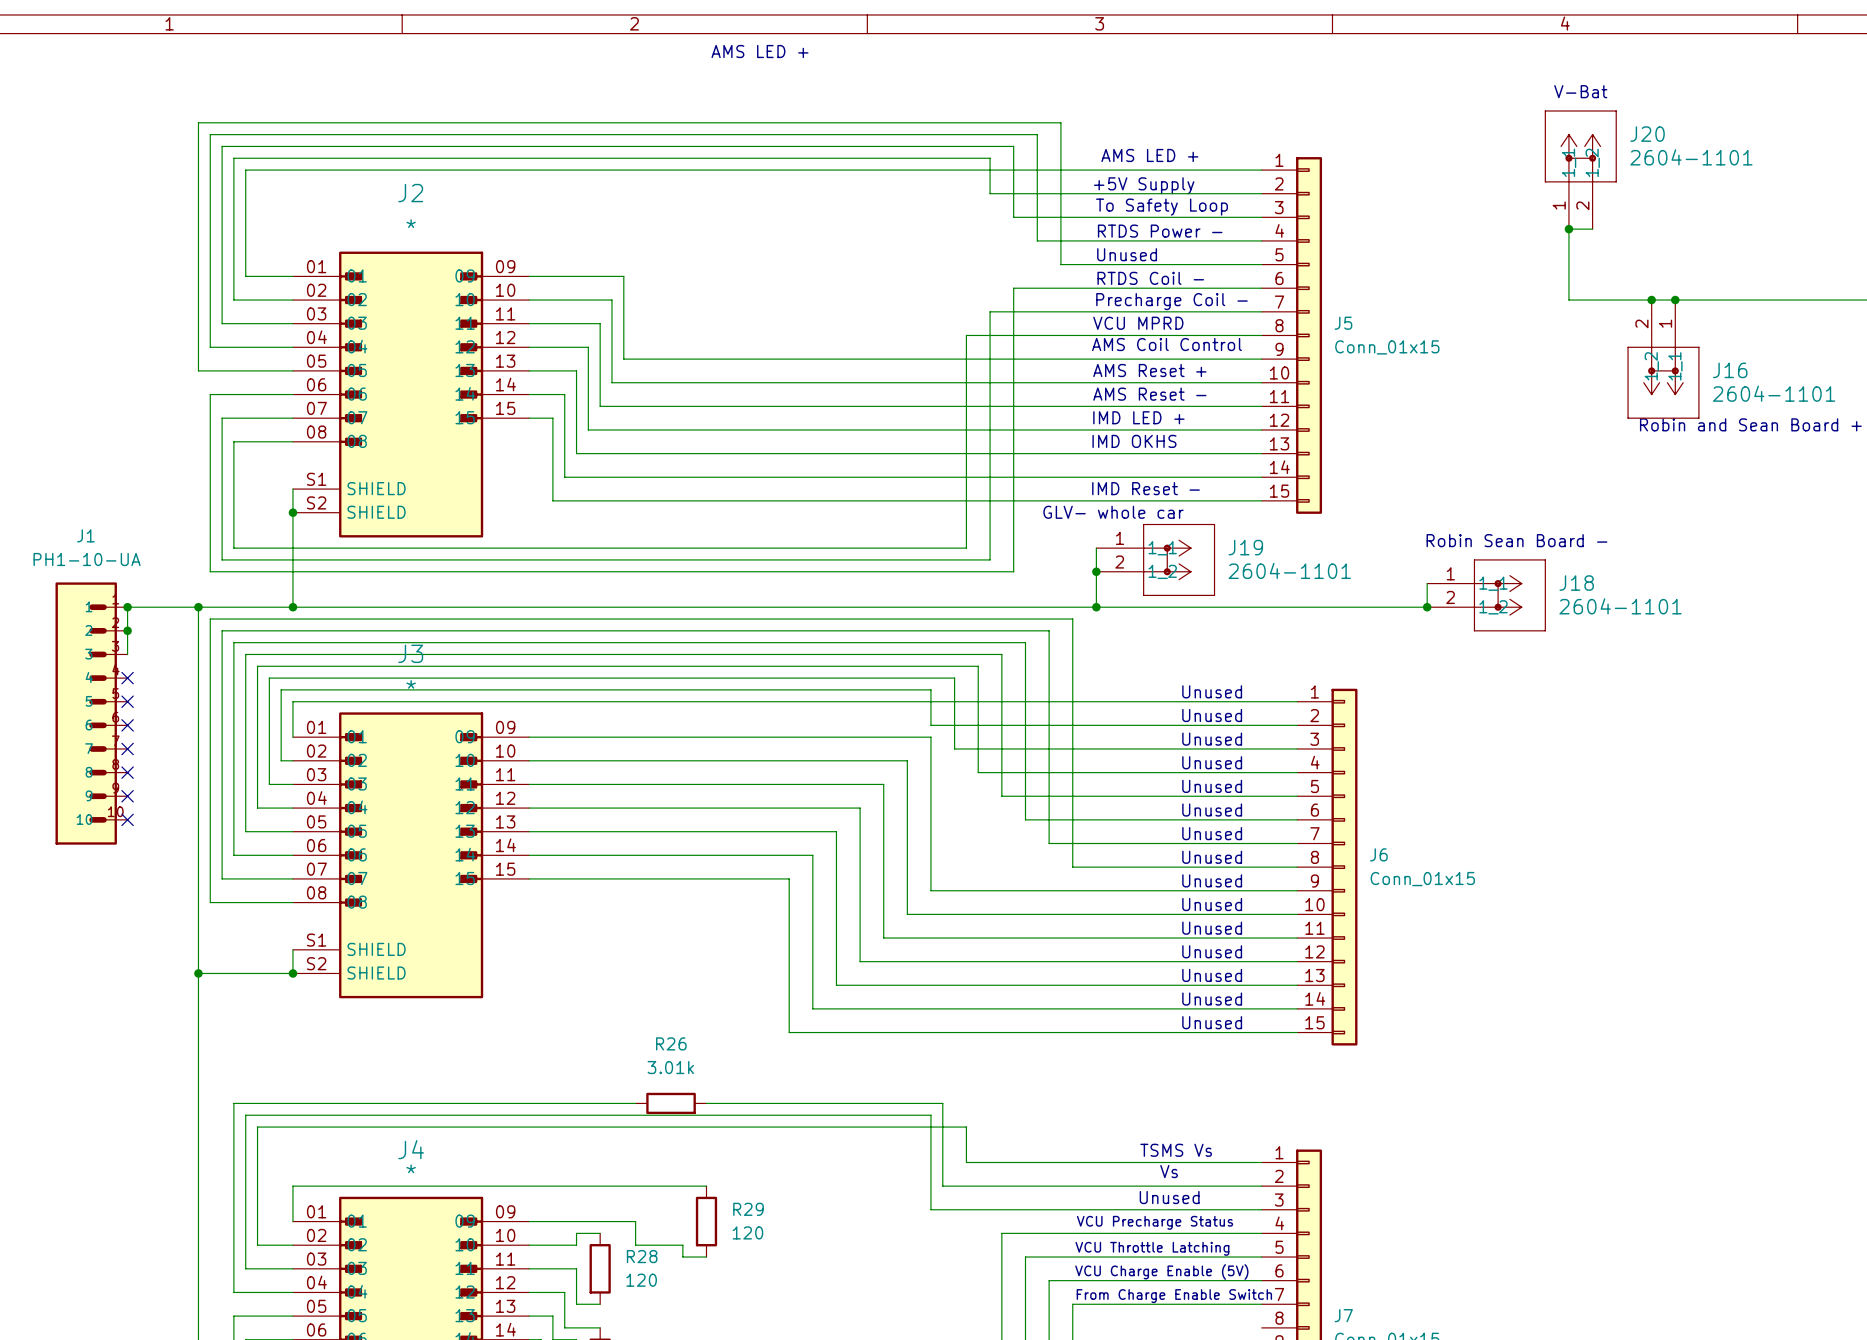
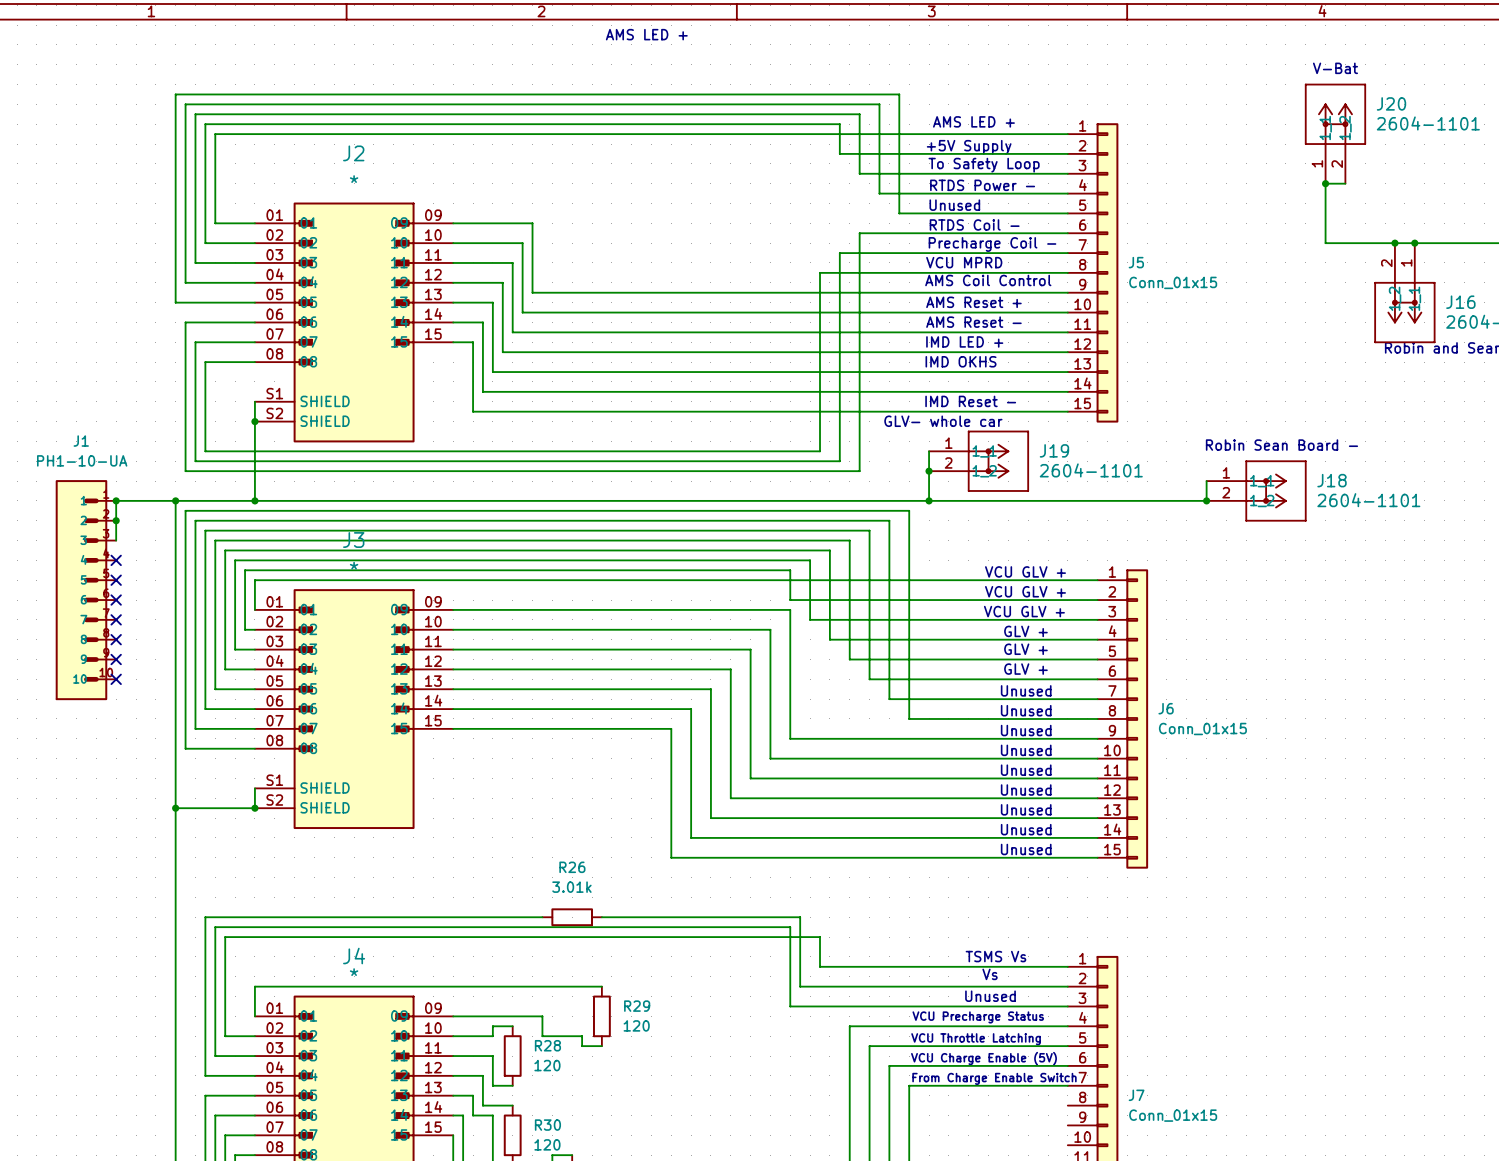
text: Unused (1212, 691) -> VCU GLV + (1025, 571)
text: Unused (1212, 715) -> VCU GLV + (1025, 591)
text: Unused (1212, 739) -> VCU GLV + (1024, 611)
text: Unused (1212, 762) -> GLV + (1025, 631)
text: Unused (1212, 786) -> GLV + (1025, 649)
text: Unused (1212, 810) -> GLV + (1025, 669)

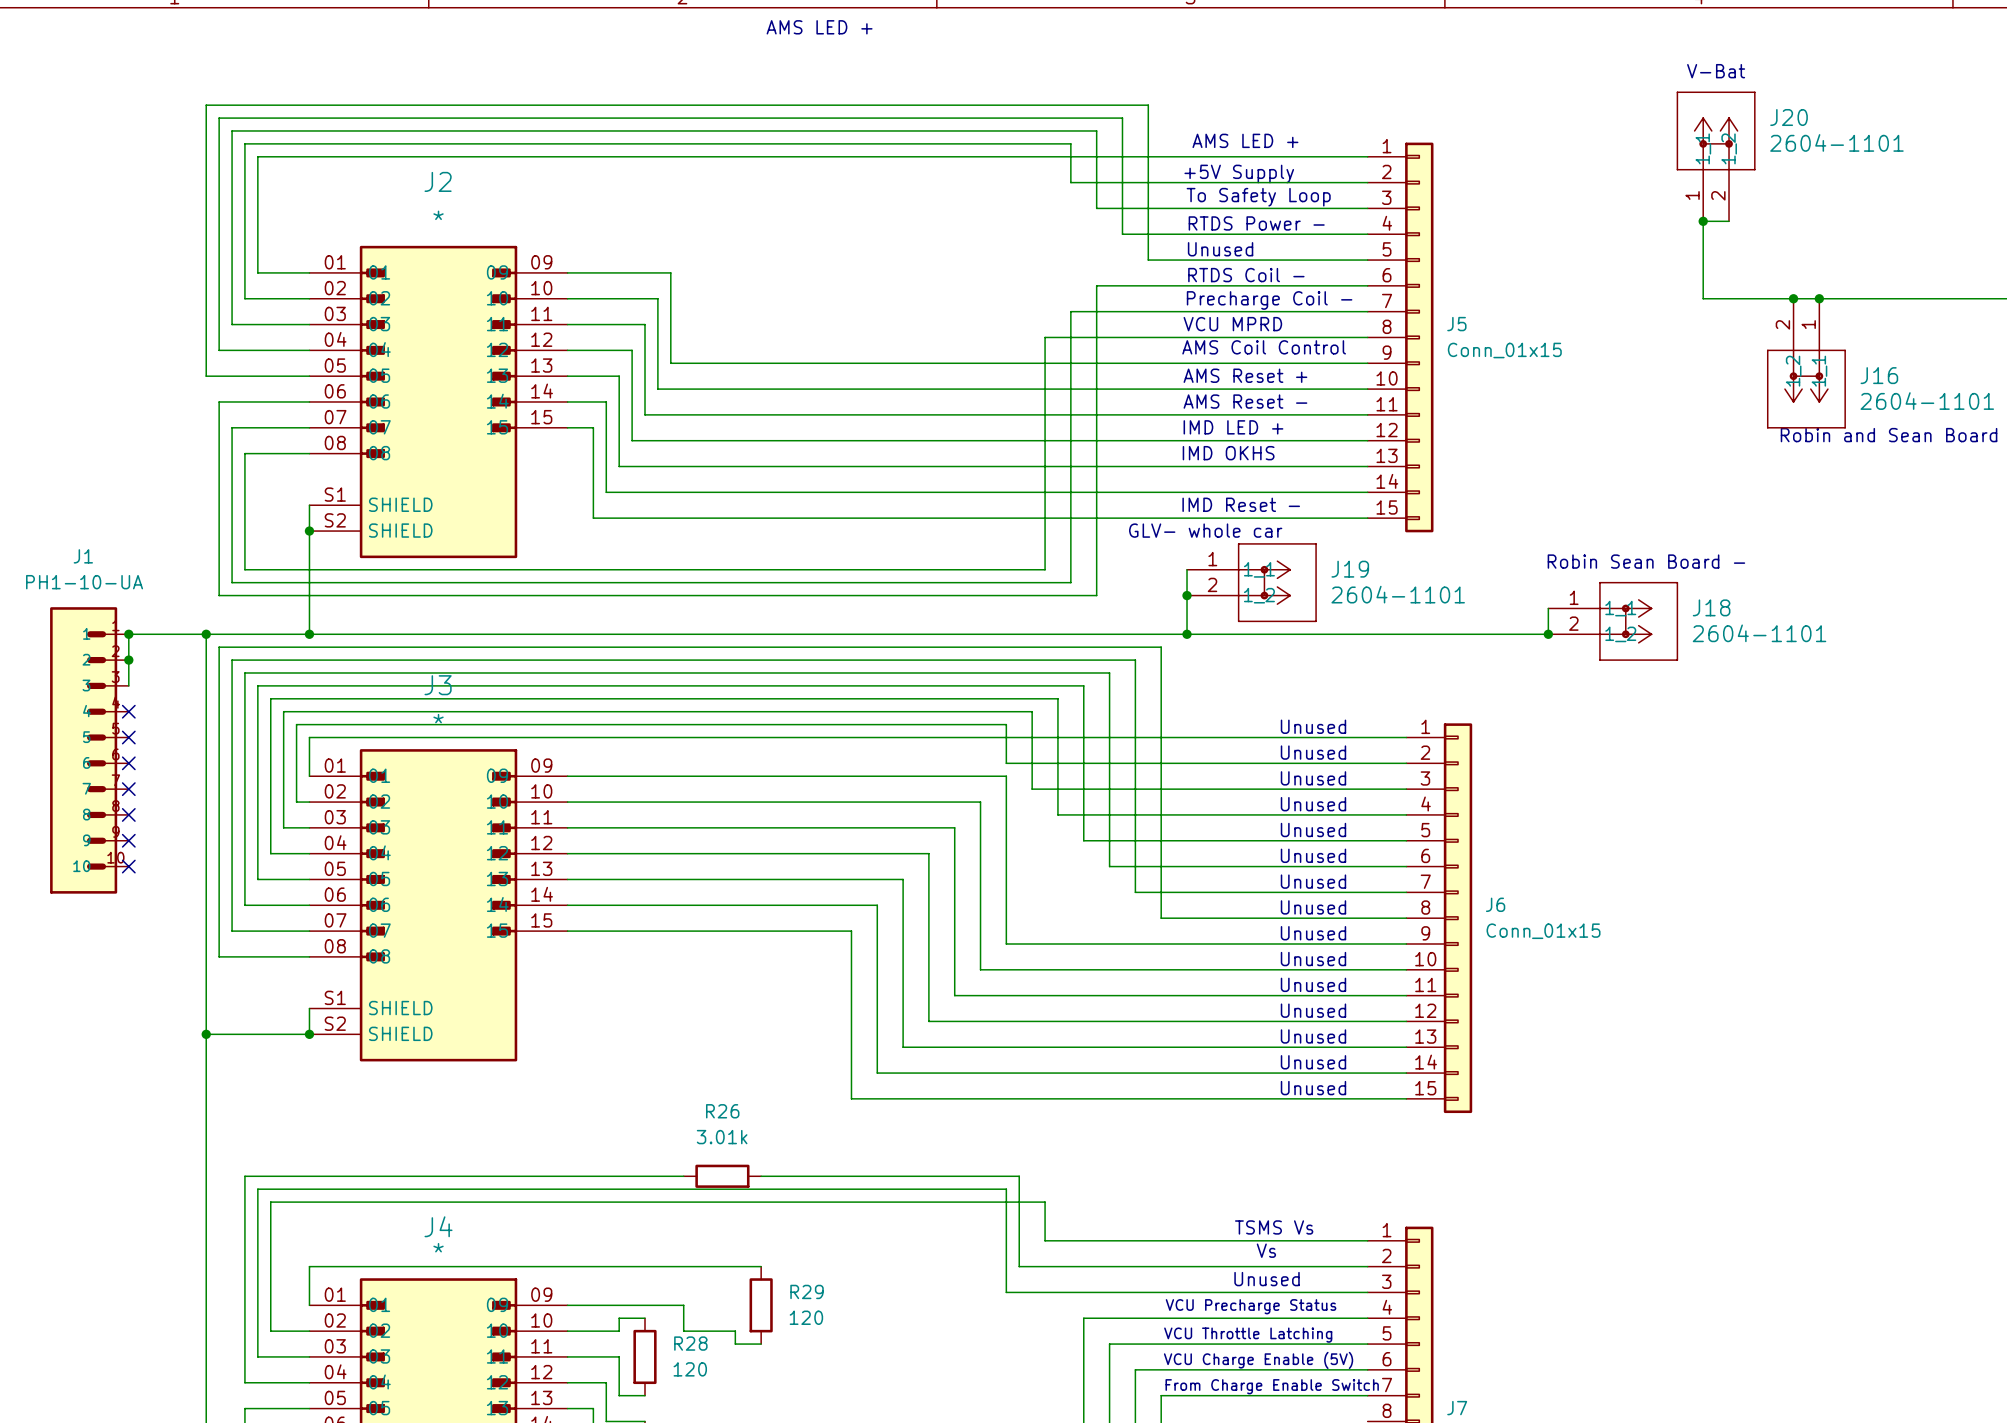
text: VCU GLV + (1025, 571) -> Unused (1313, 726)
text: VCU GLV + (1025, 591) -> Unused (1313, 752)
text: VCU GLV + (1024, 611) -> Unused (1313, 778)
text: GLV + (1025, 631) -> Unused (1313, 804)
text: GLV + (1025, 649) -> Unused (1313, 829)
text: GLV + (1025, 669) -> Unused (1313, 855)

